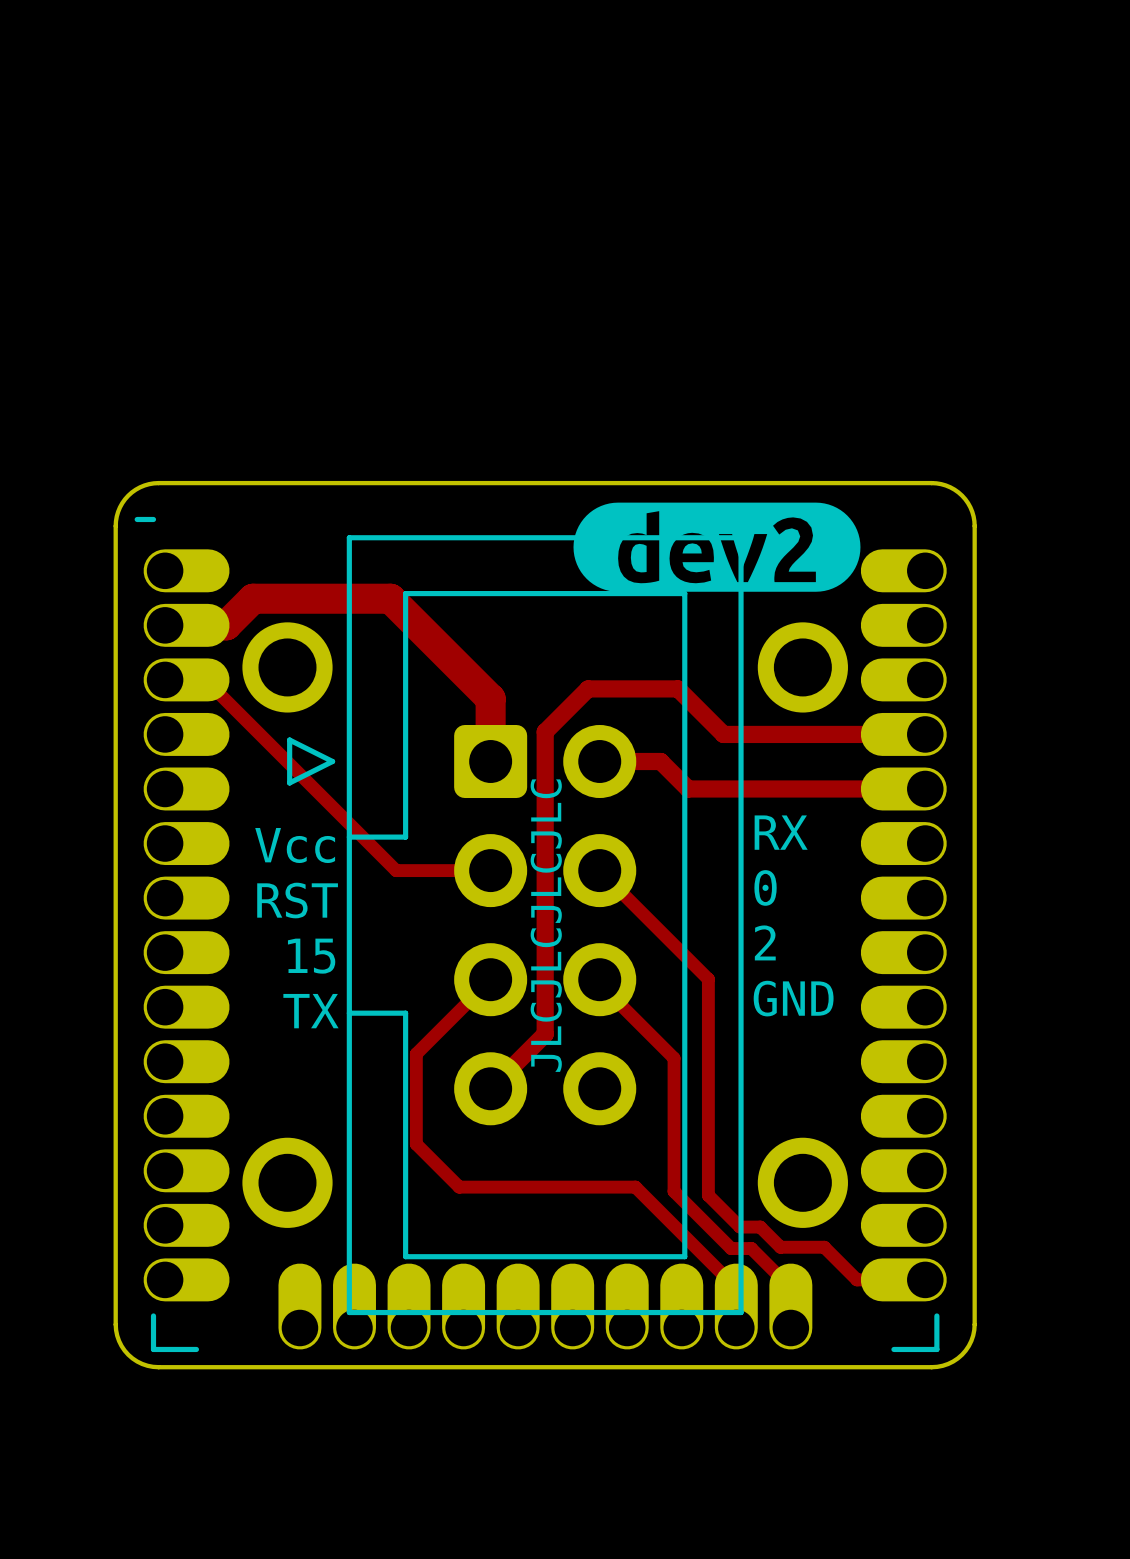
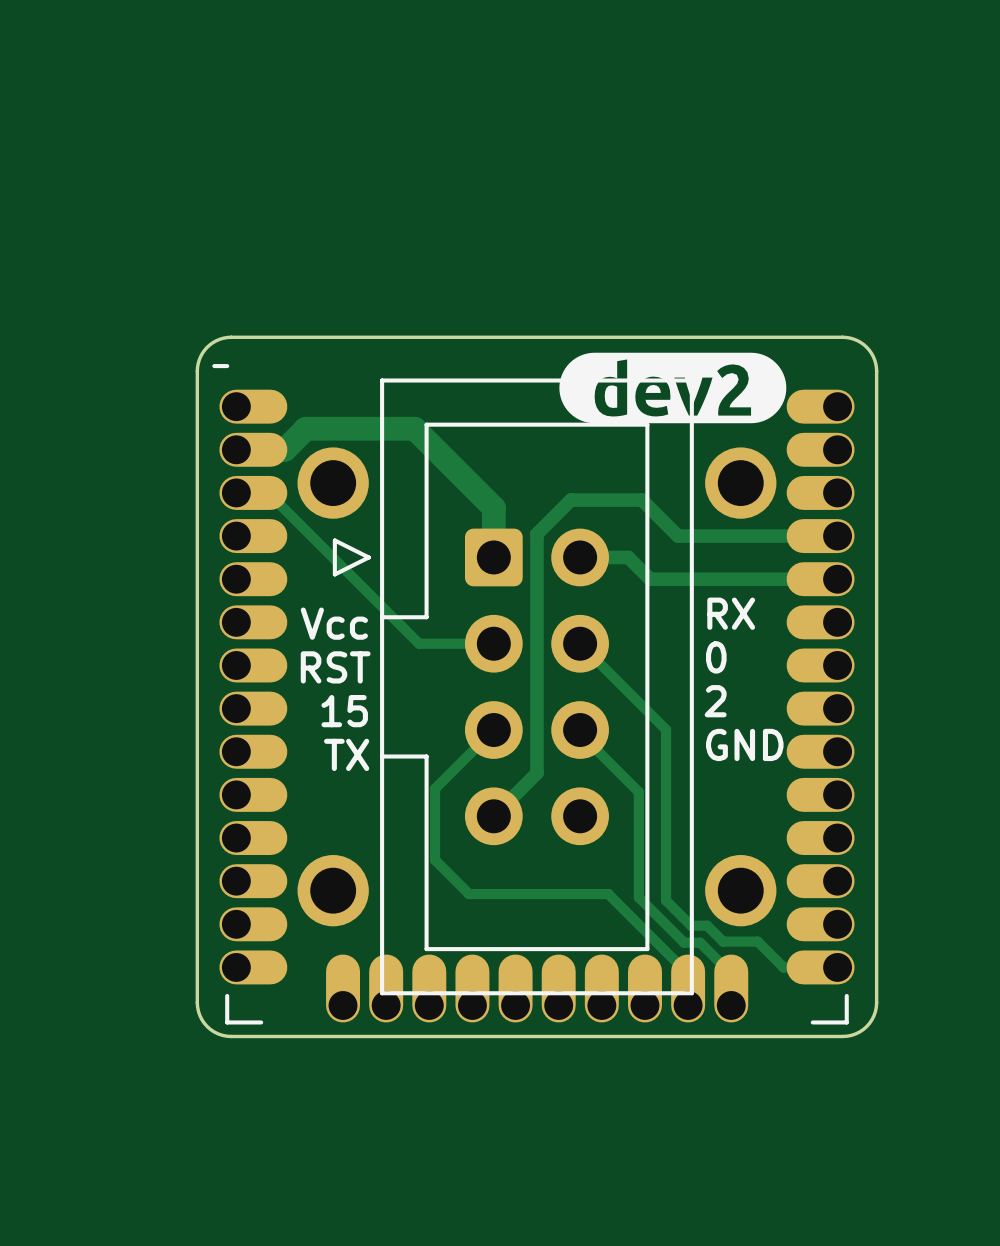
text: JLCJLCJLCJLC (546, 925) -> none

